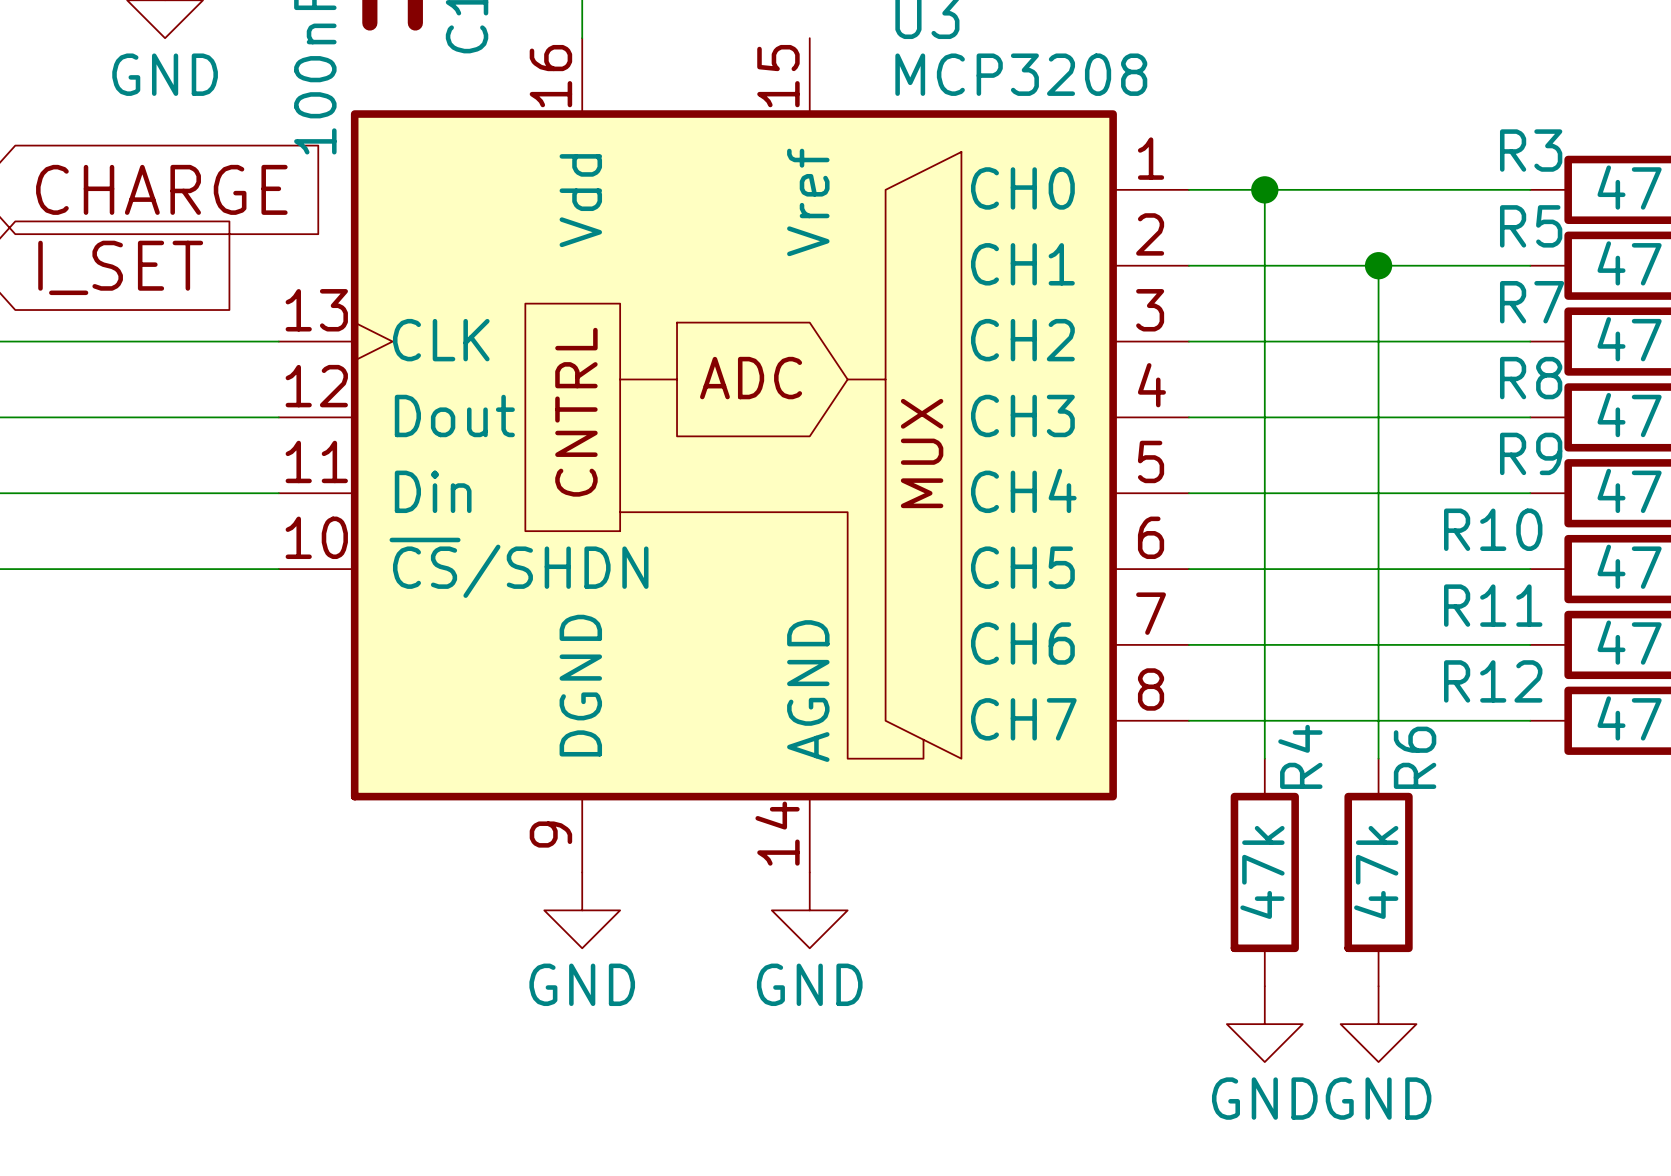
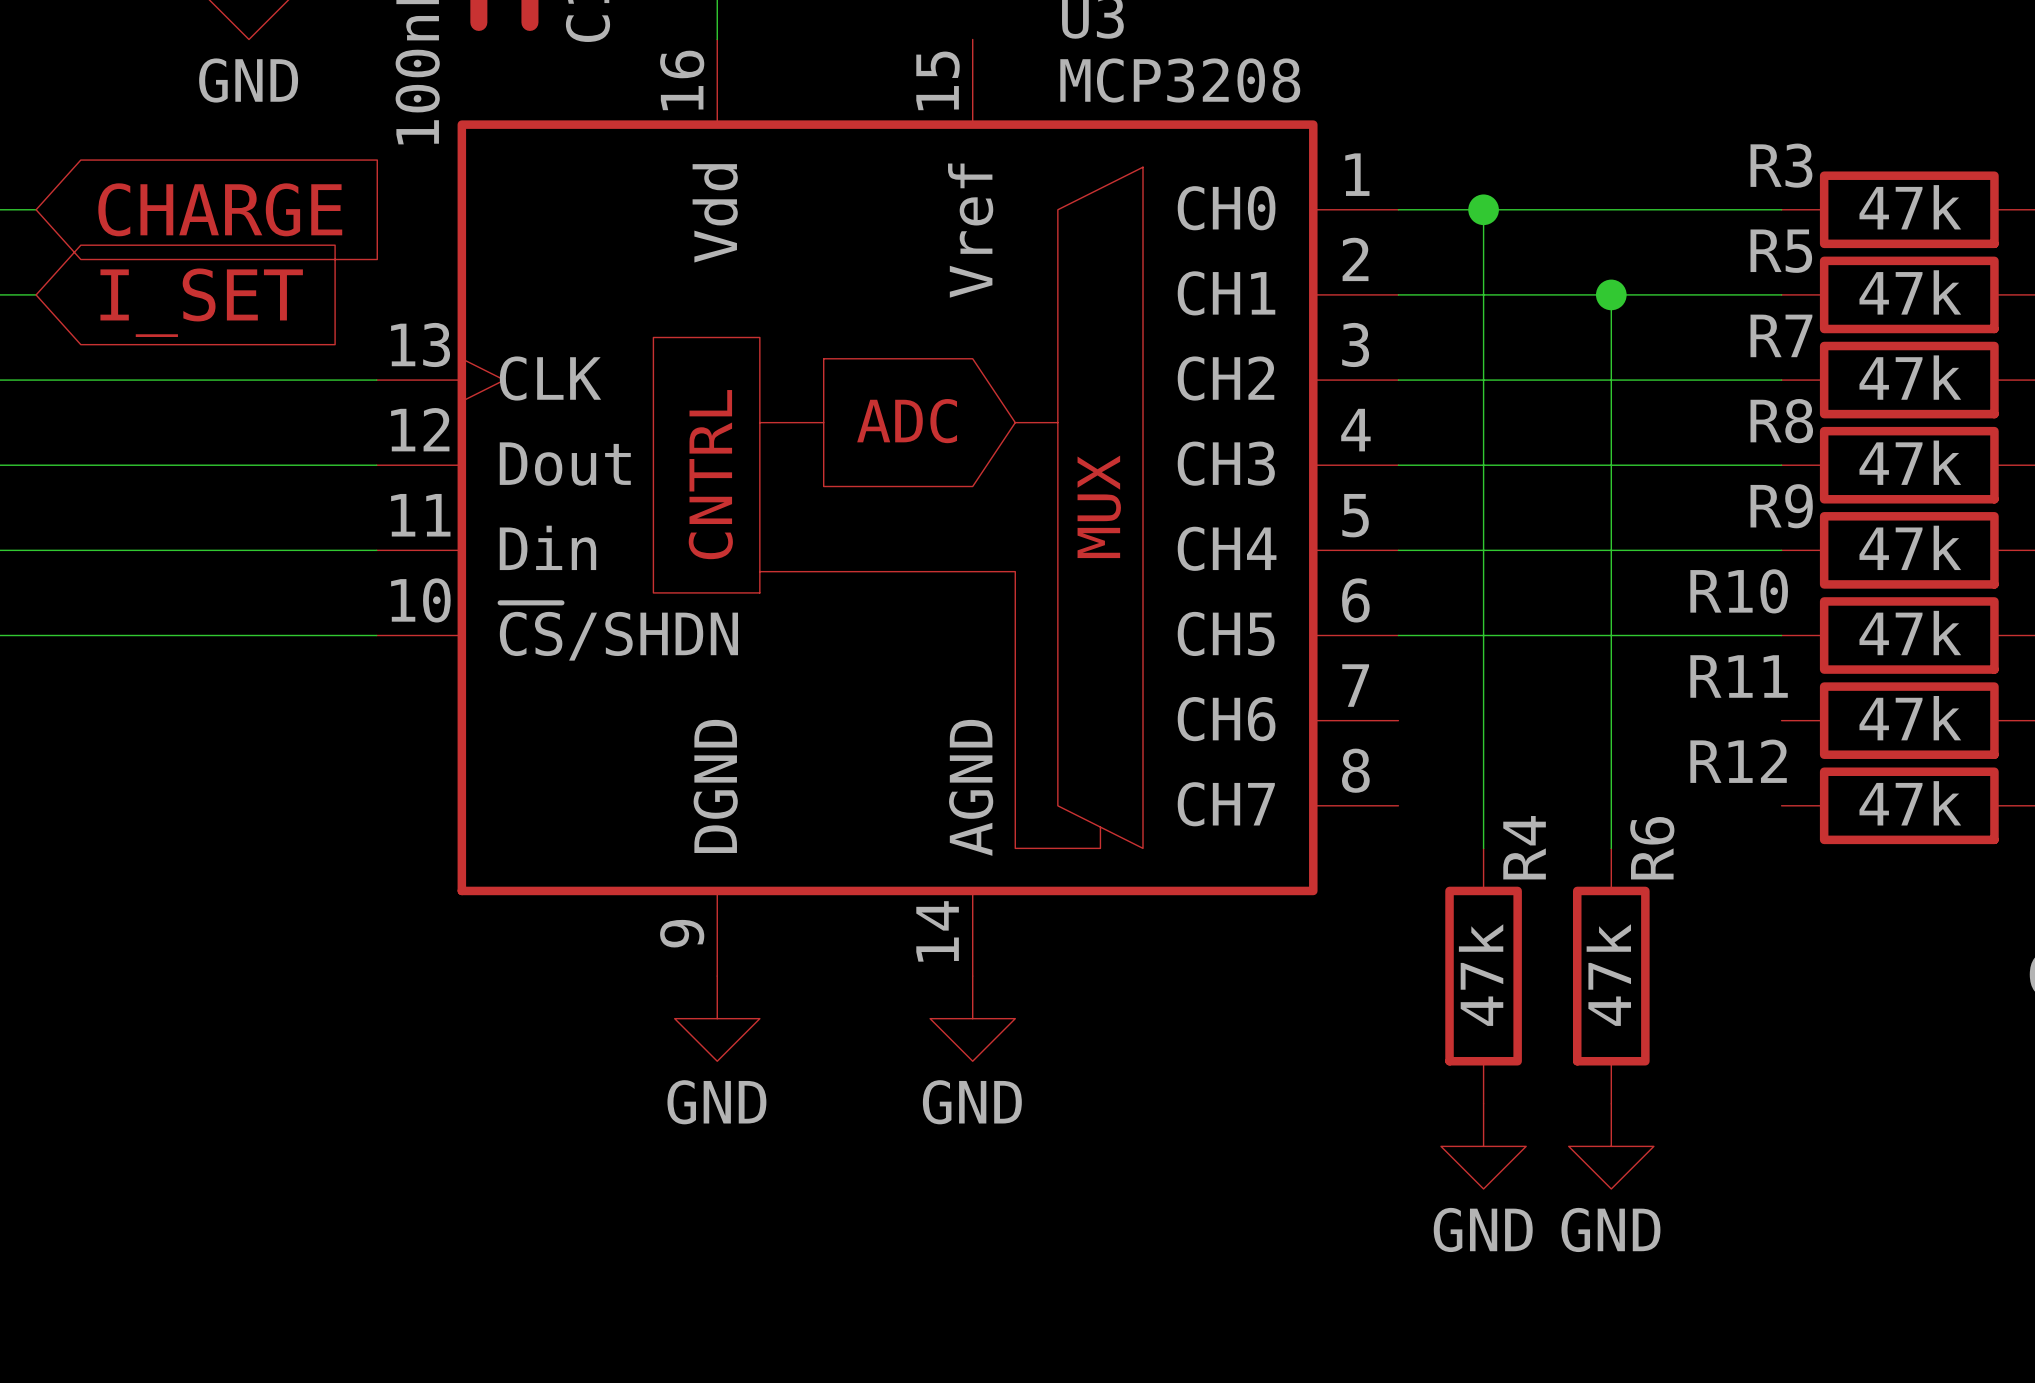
wire: (1188, 644) (1530, 644) -> none
wire: (1188, 720) (1530, 720) -> none

